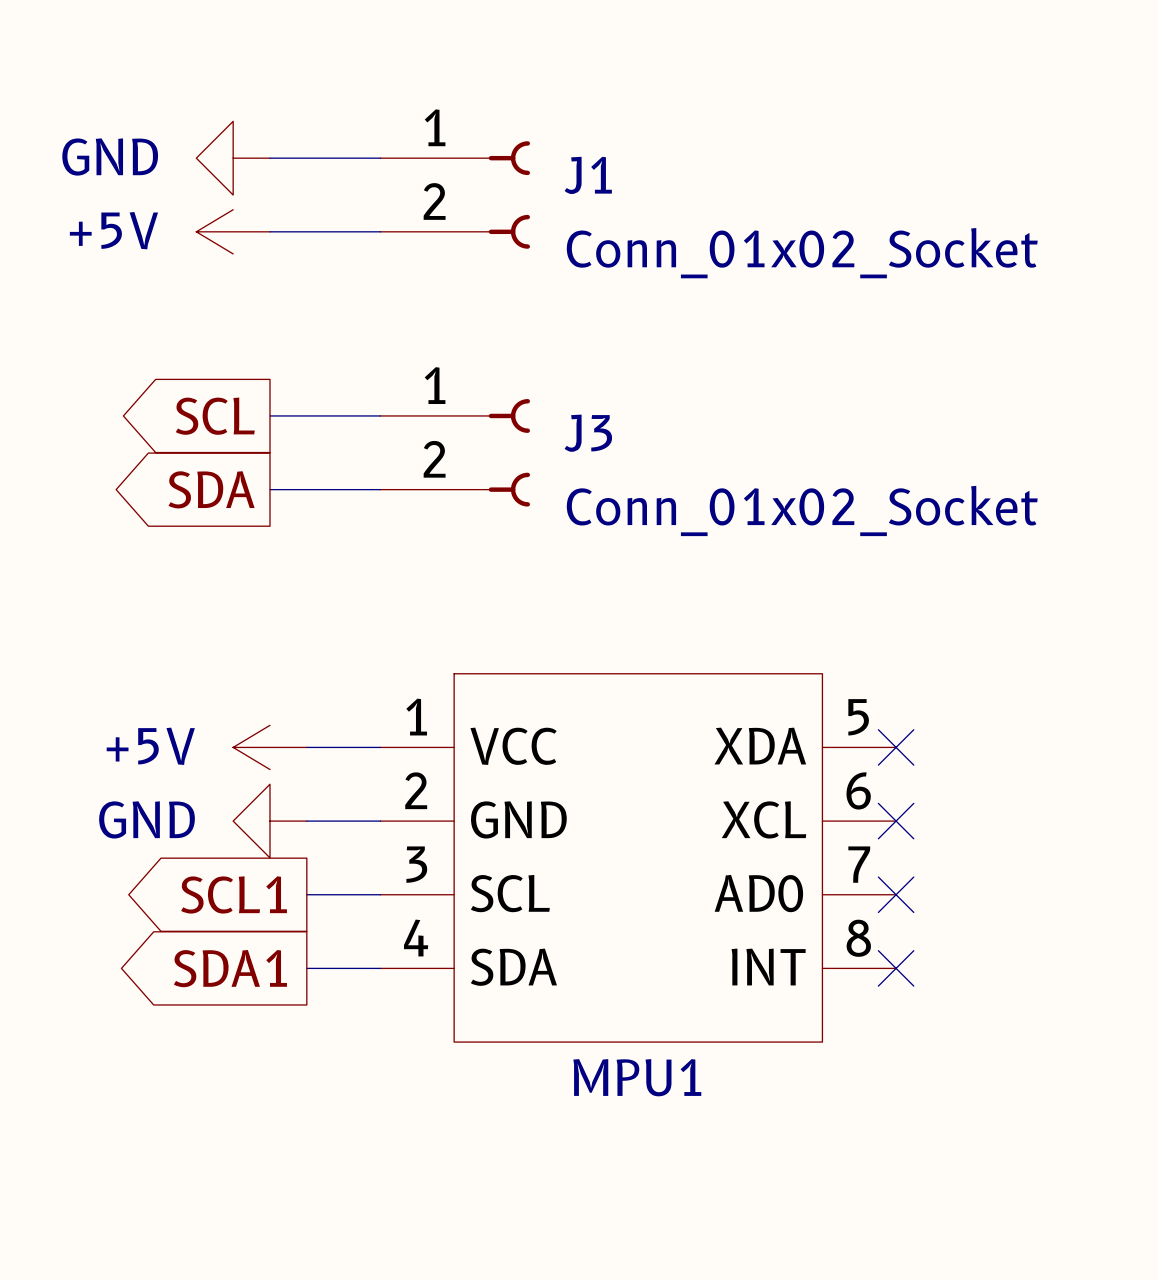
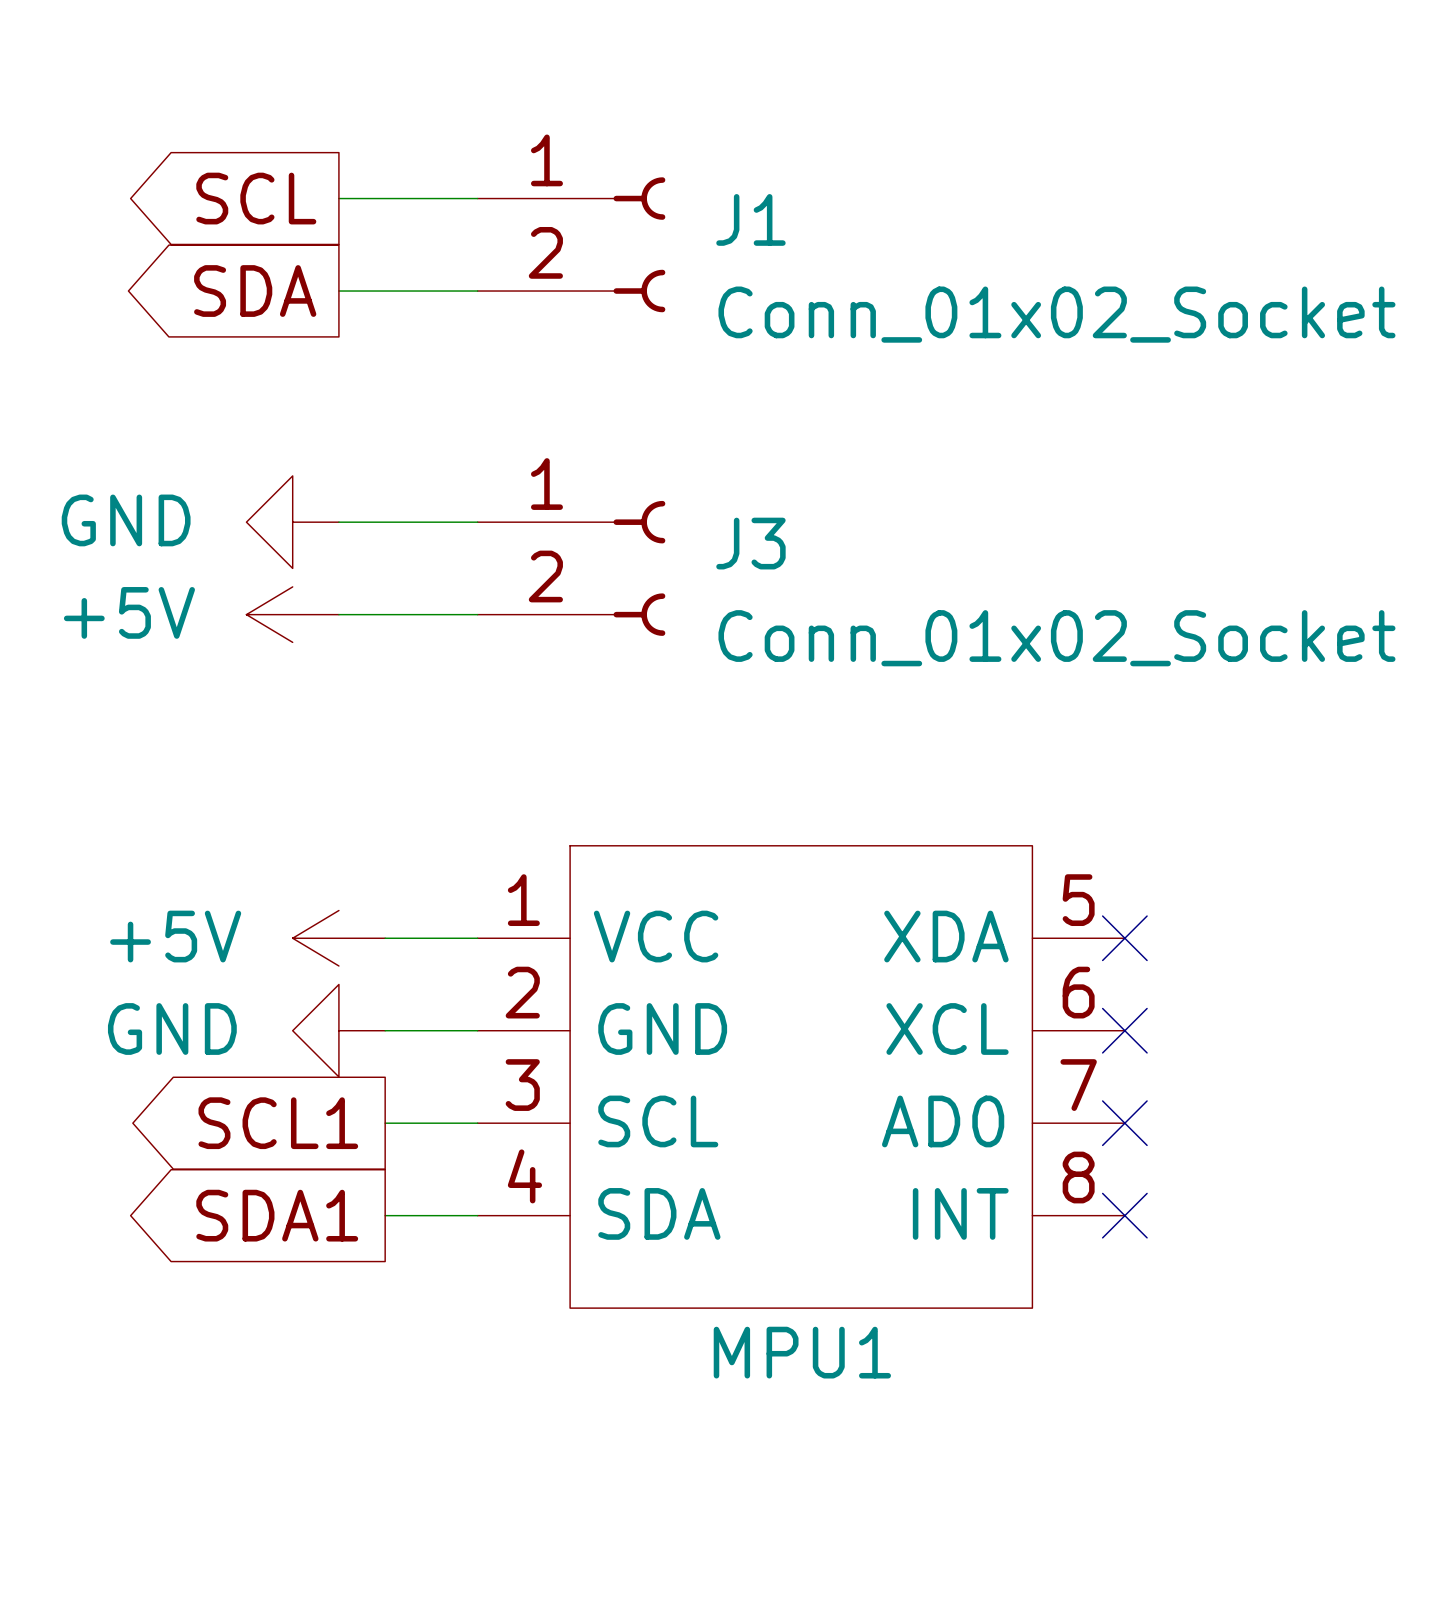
power symbol position: GND (233, 158) -> GND (292, 522)
power symbol position: +5V (233, 231) -> +5V (292, 614)
global label position: SCL (215, 416) -> SCL (256, 198)
global label position: SDA (211, 489) -> SDA (255, 291)

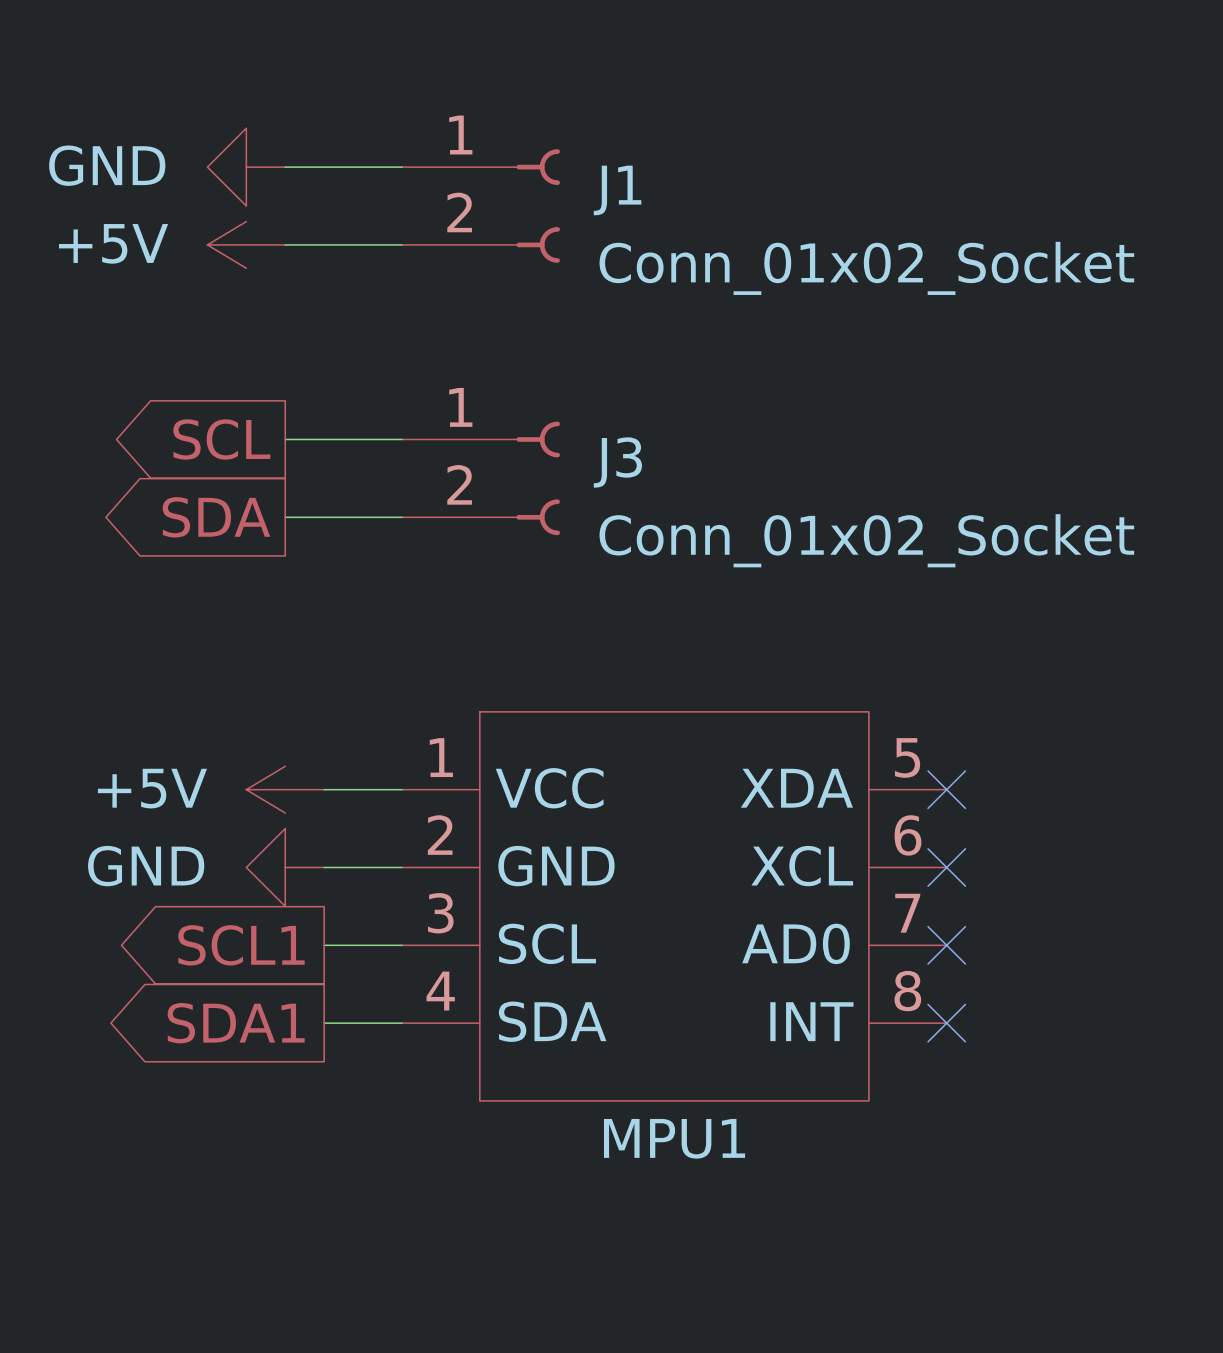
global label position: SCL (256, 198) -> SCL (221, 439)
global label position: SDA (255, 291) -> SDA (216, 517)
power symbol position: GND (292, 522) -> GND (246, 167)
power symbol position: +5V (292, 614) -> +5V (246, 244)

